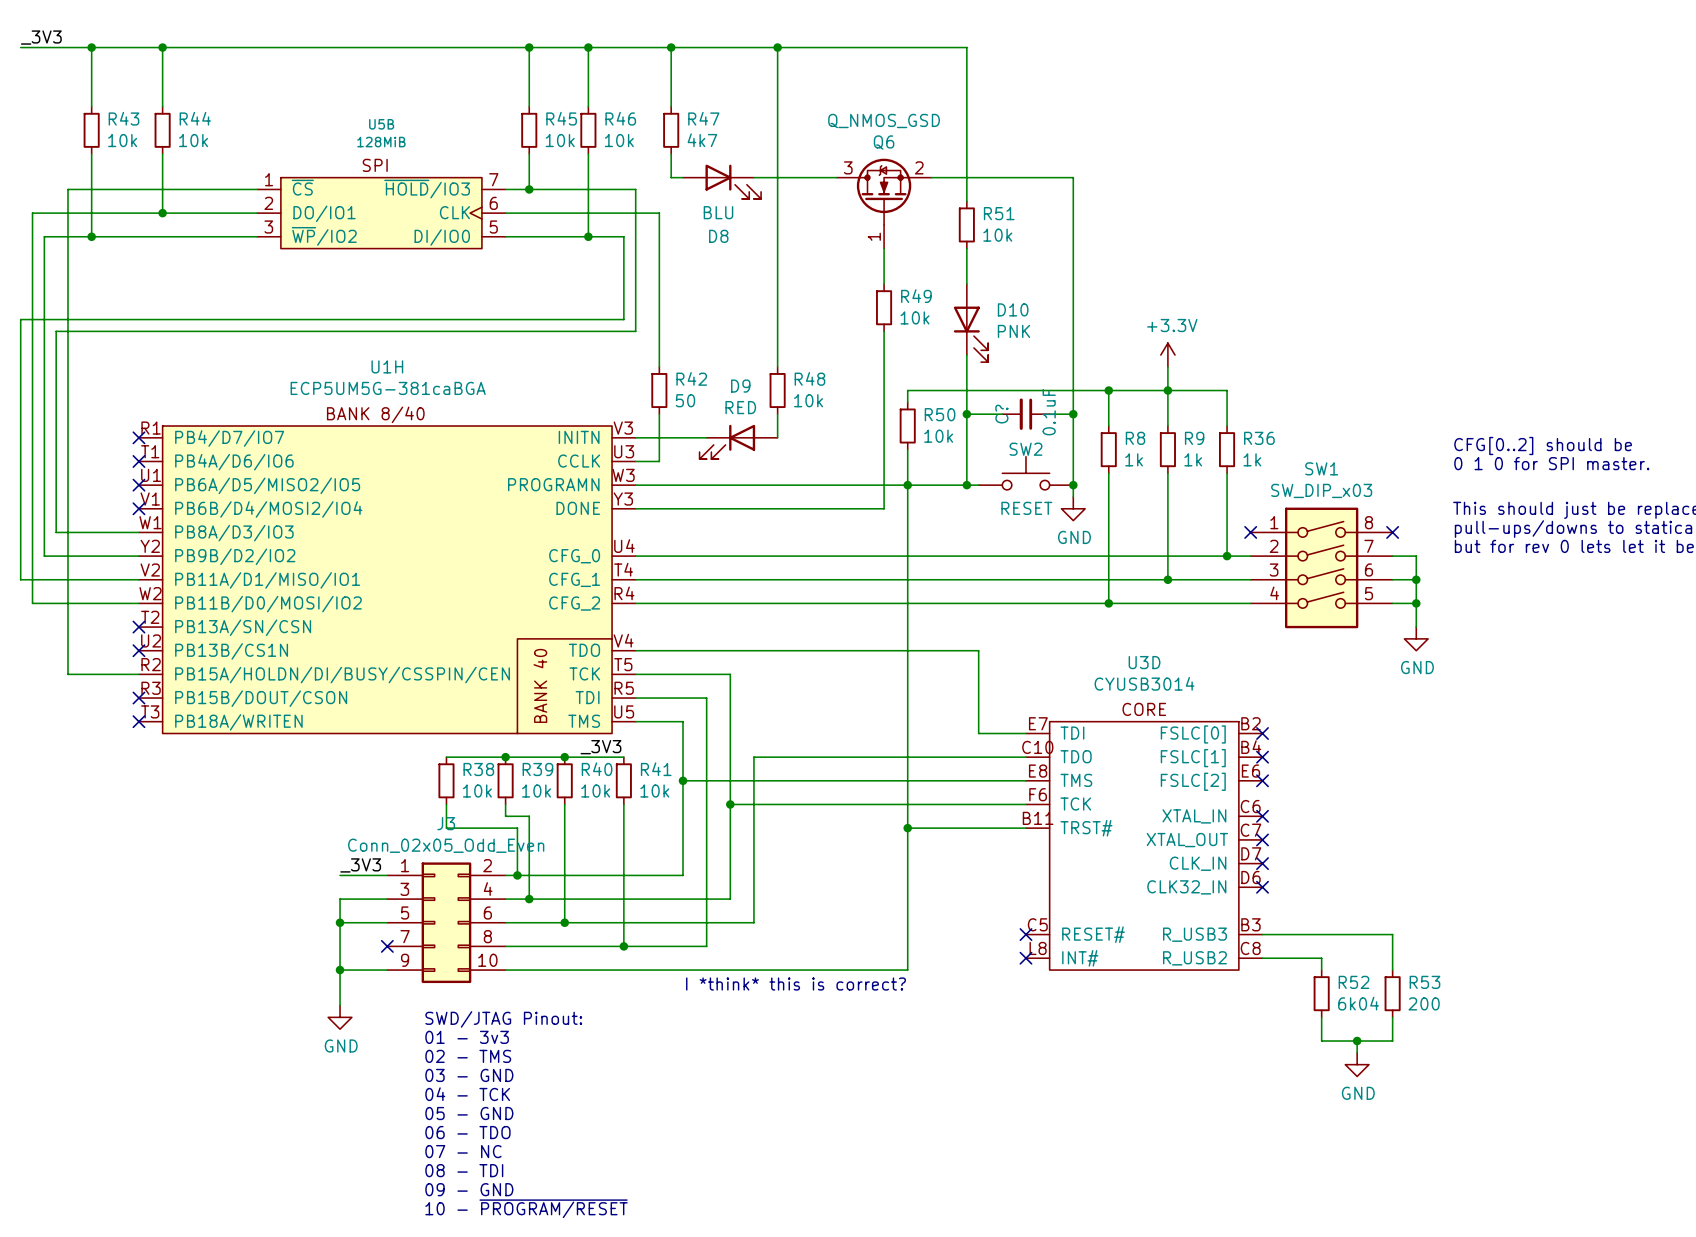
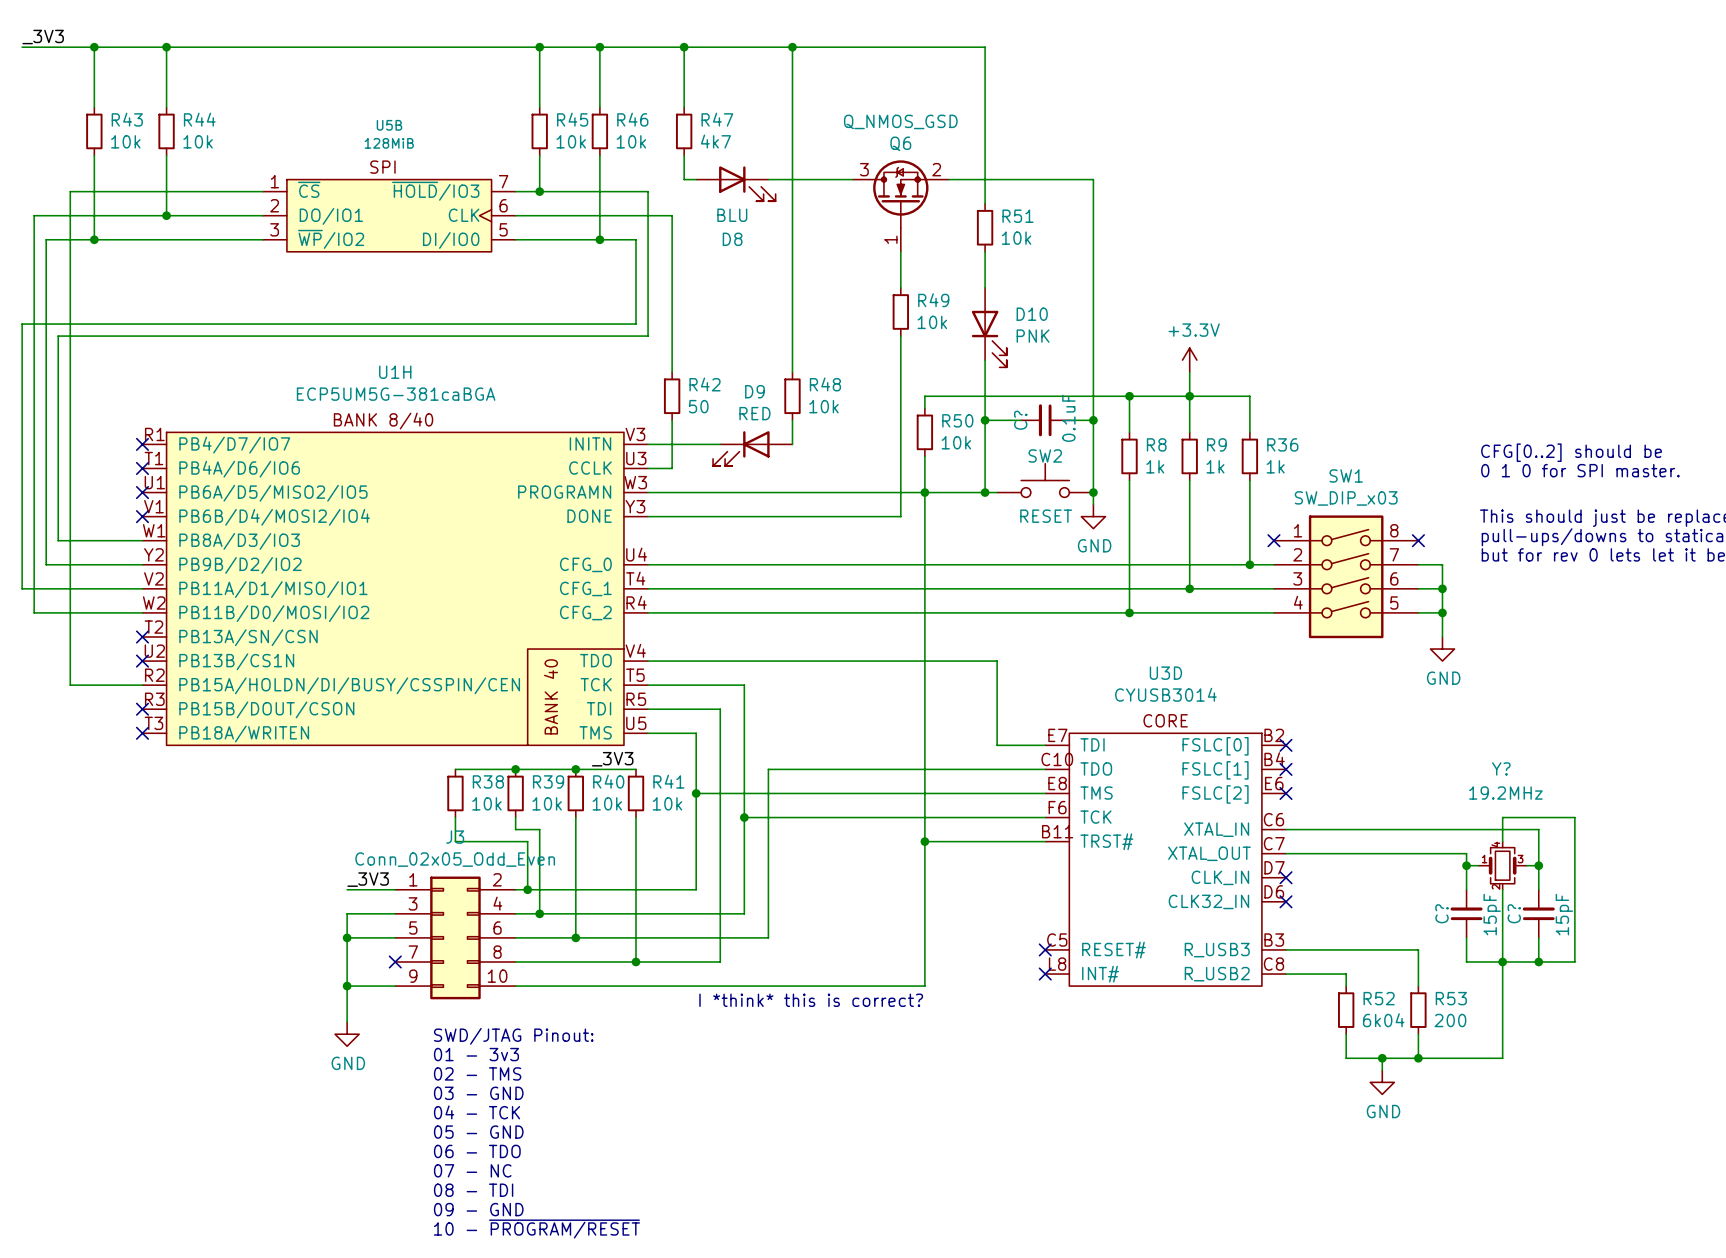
wire: none -> (1286, 829) (1538, 829) (1538, 889)
no-connect mark: (1262, 816) -> none
wire: none -> (1502, 841) (1502, 817) (1574, 817) (1574, 961) (1466, 961) (1466, 937)
wire: none -> (1286, 853) (1466, 853) (1466, 889)
no-connect mark: (1262, 839) -> none
wire: none -> (1466, 865) (1478, 865)
junction: none -> (1466, 865)
Y?: none -> 19.2MHz (1502, 865)
wire: none -> (1526, 865) (1538, 865)
junction: none -> (1538, 865)
wire: none -> (1502, 889) (1502, 1058) (1418, 1058)
C?: none -> 15pF (1466, 913)
C?: none -> 15pF (1538, 913)
wire: none -> (1538, 937) (1538, 961)
junction: none -> (1502, 961)
junction: none -> (1538, 961)
junction: none -> (1418, 1058)

